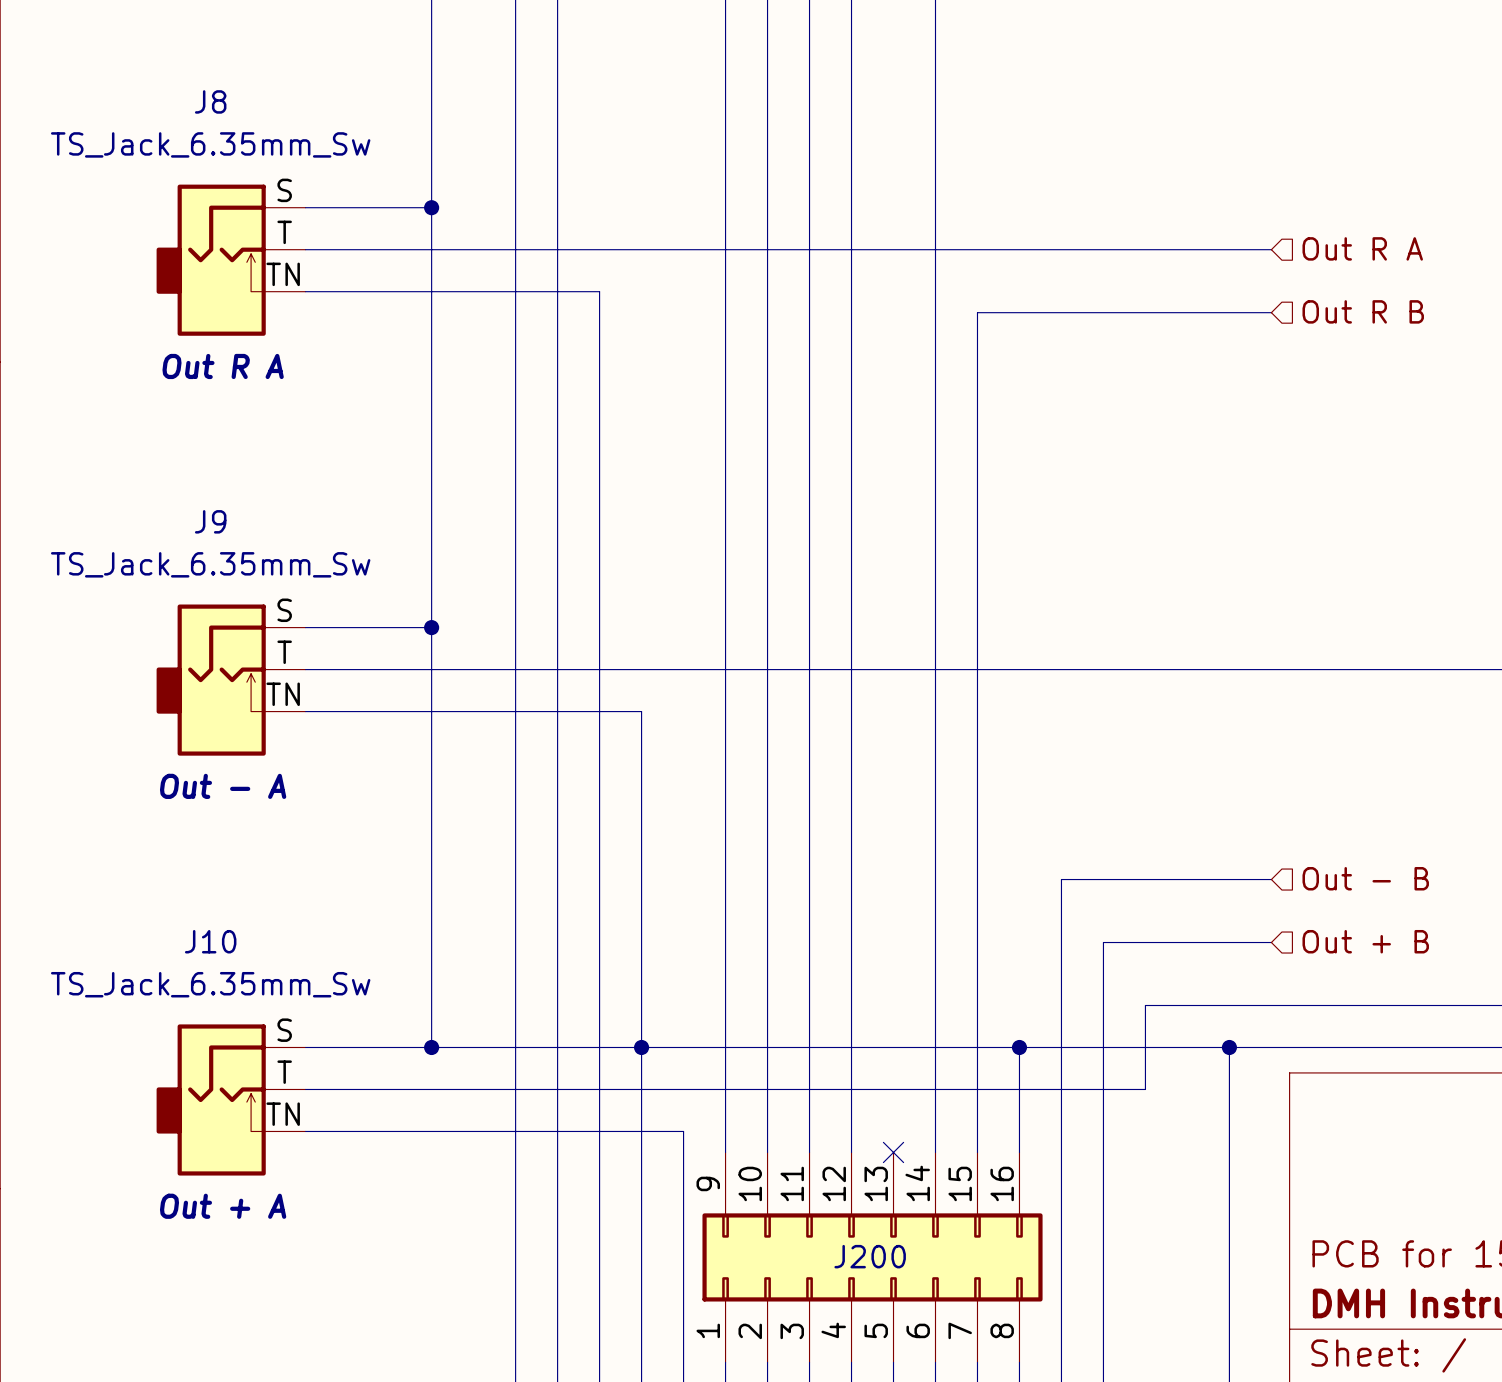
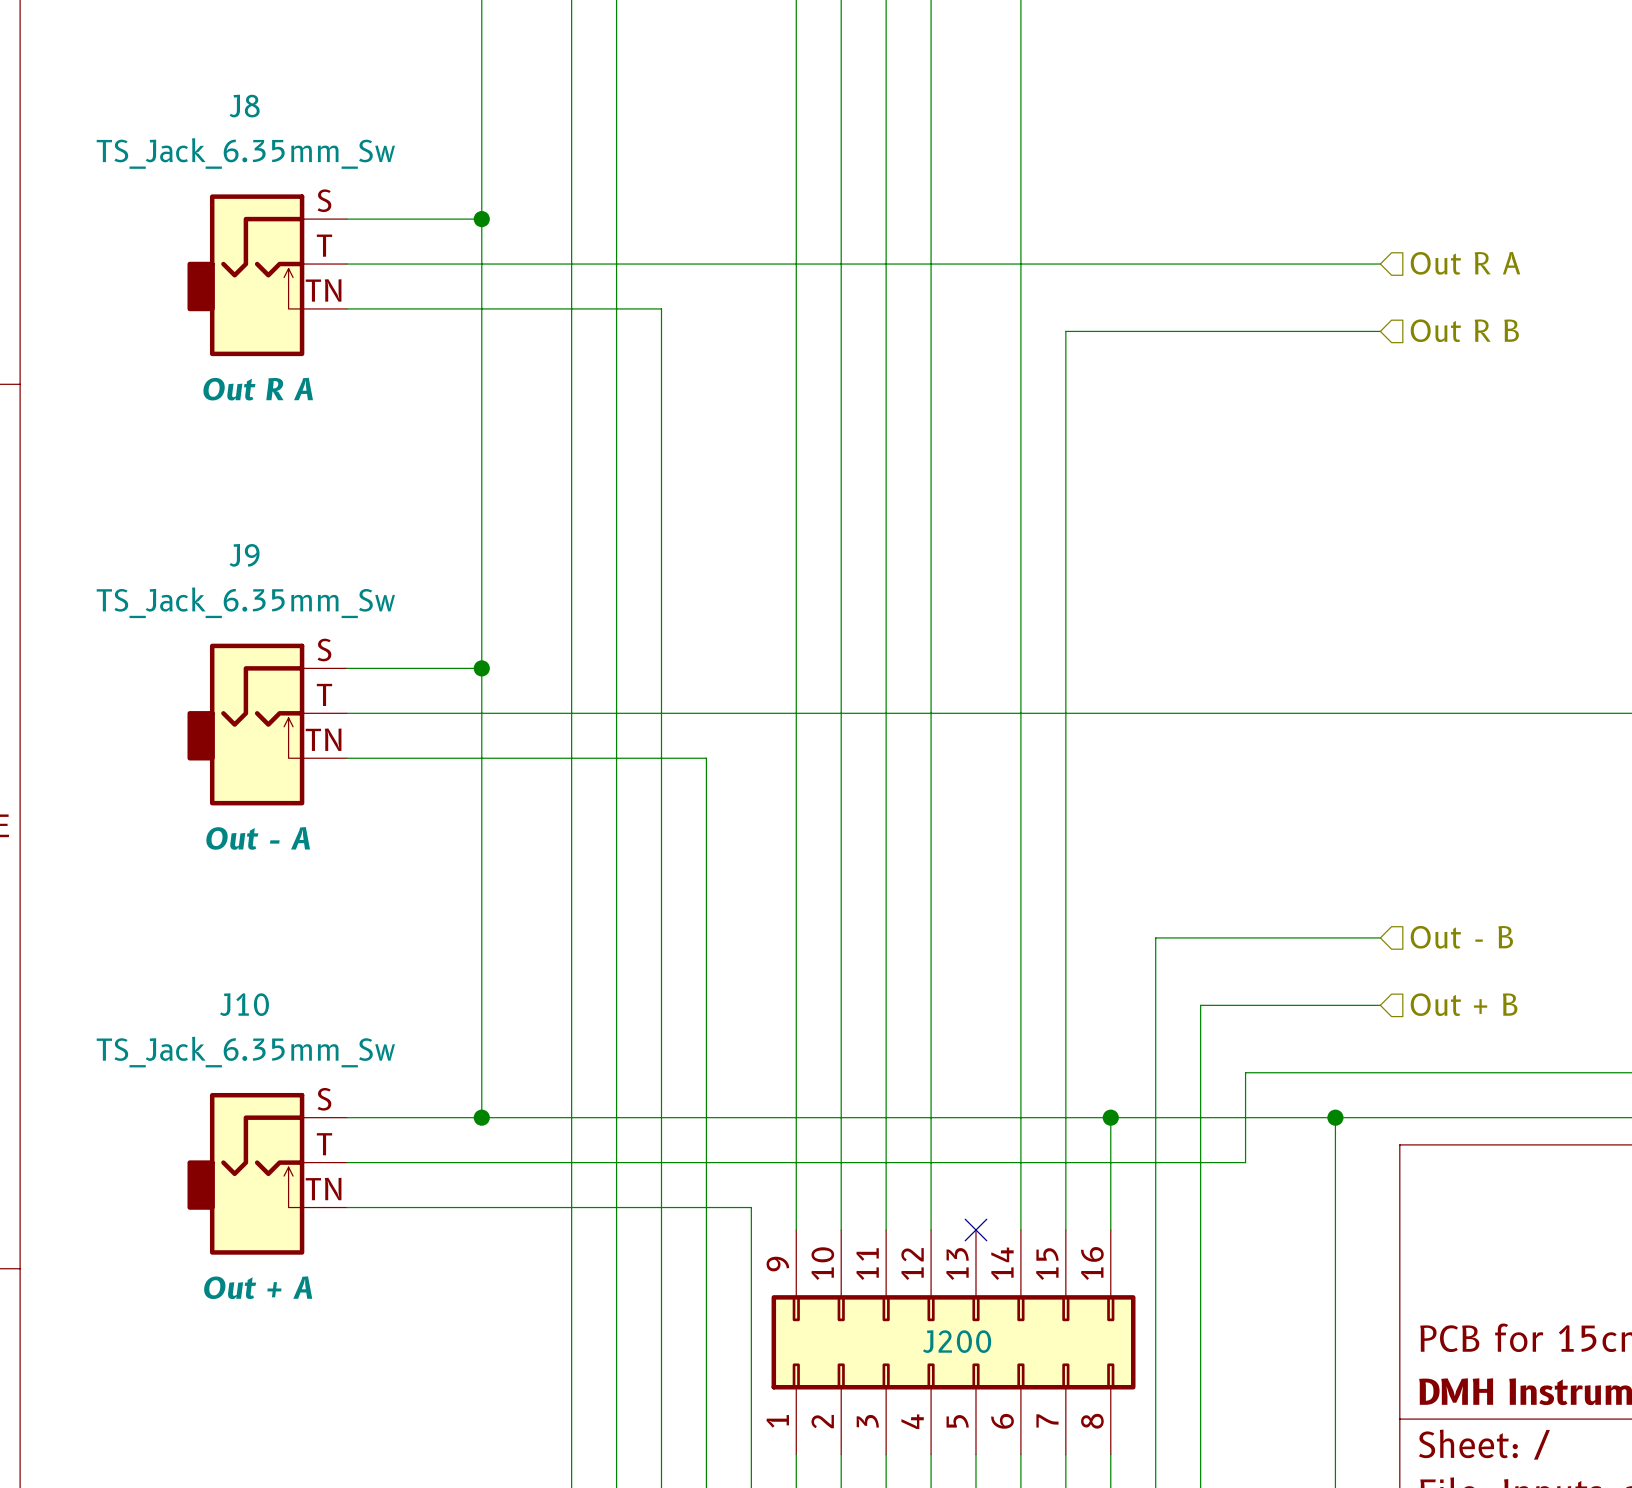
junction: (641, 1047) -> none

